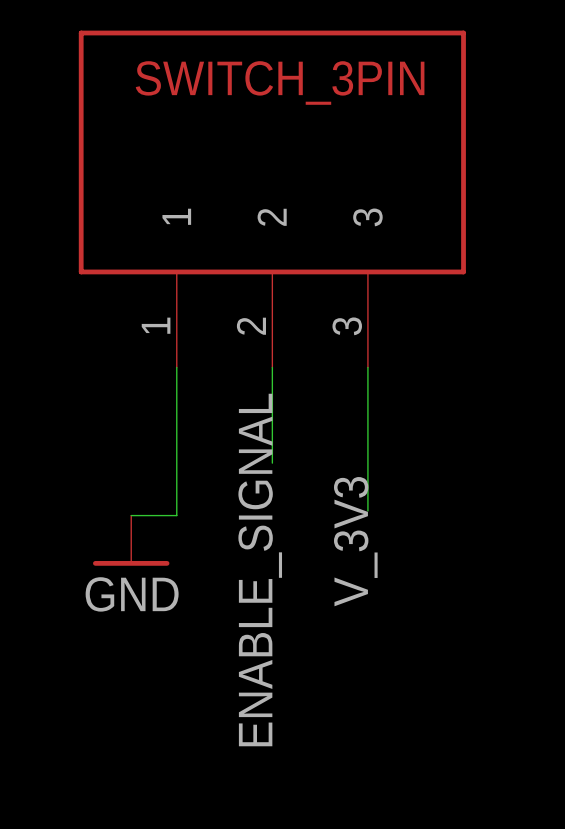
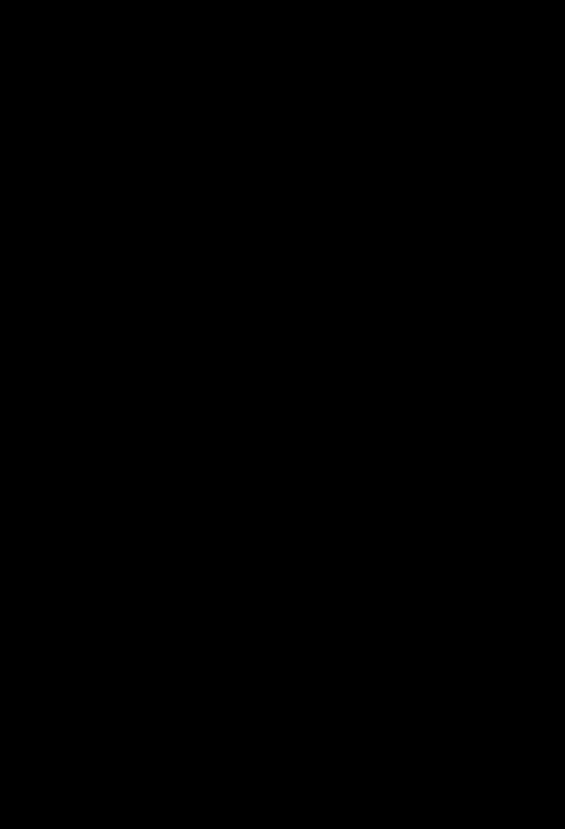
part: (272, 199) -> none
wire: (176, 367) (176, 515) (131, 515) -> none
wire: (272, 367) (272, 463) -> none
wire: (367, 367) (367, 510) -> none
power symbol: GND (131, 540) -> none
label: V_3V3 (355, 541) -> none
label: ENABLE_SIGNAL (260, 570) -> none

